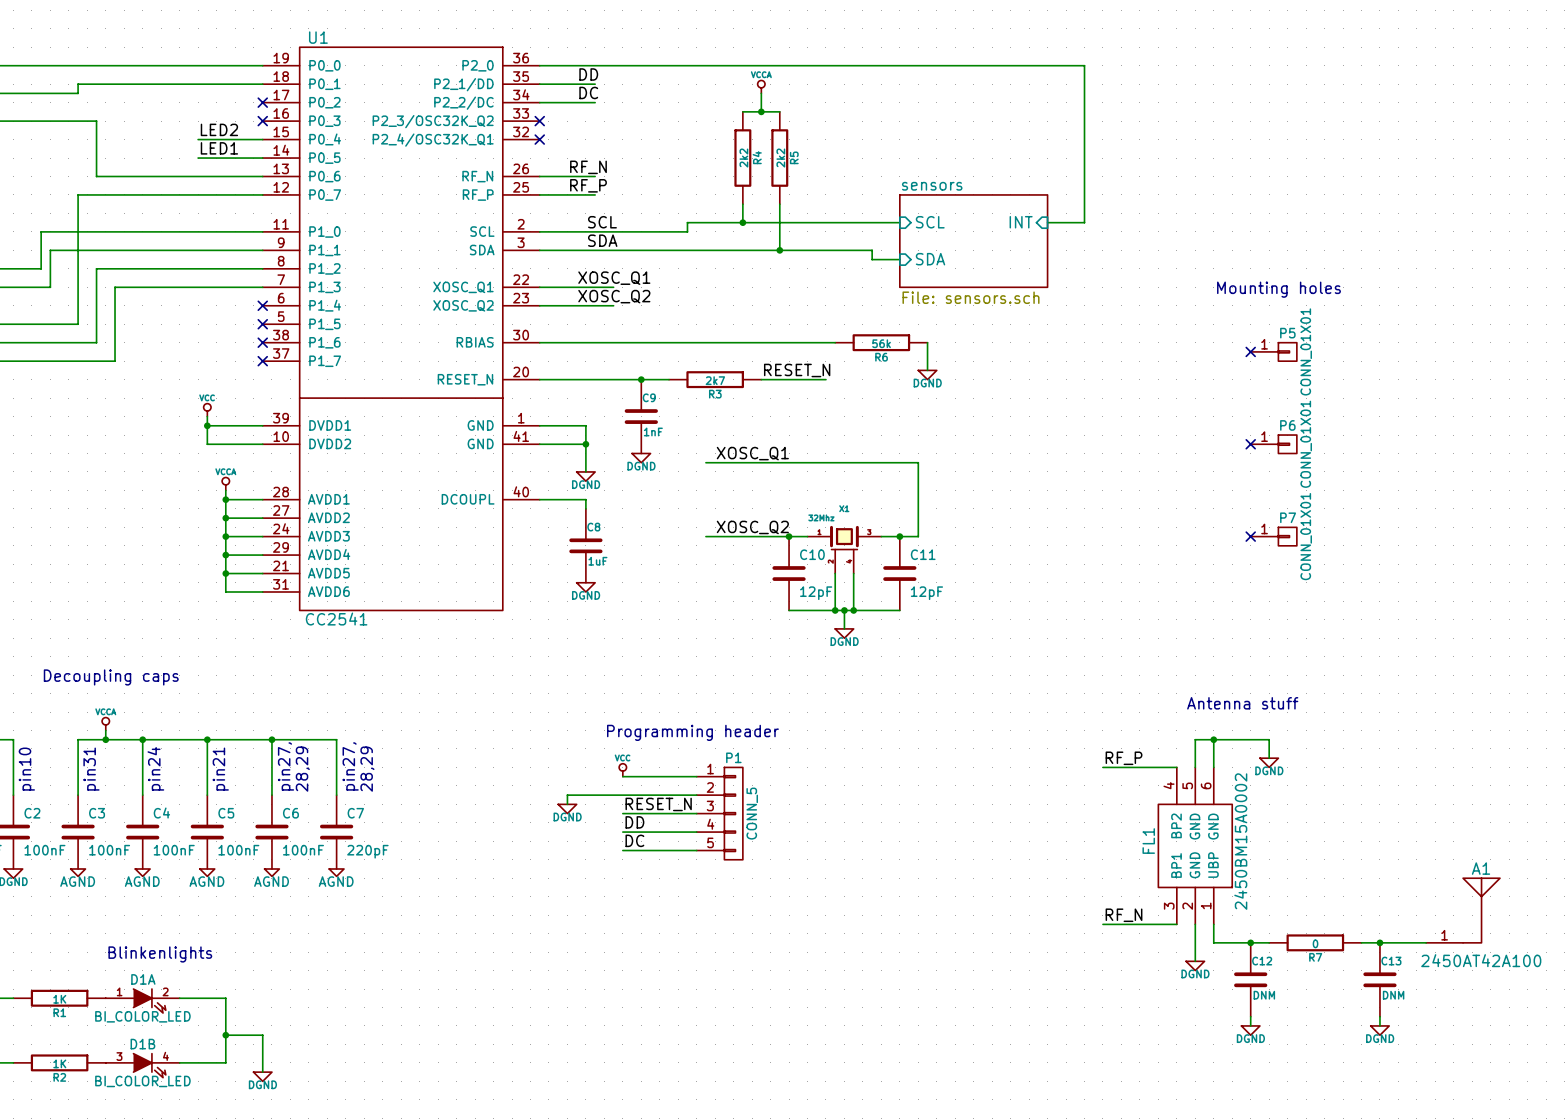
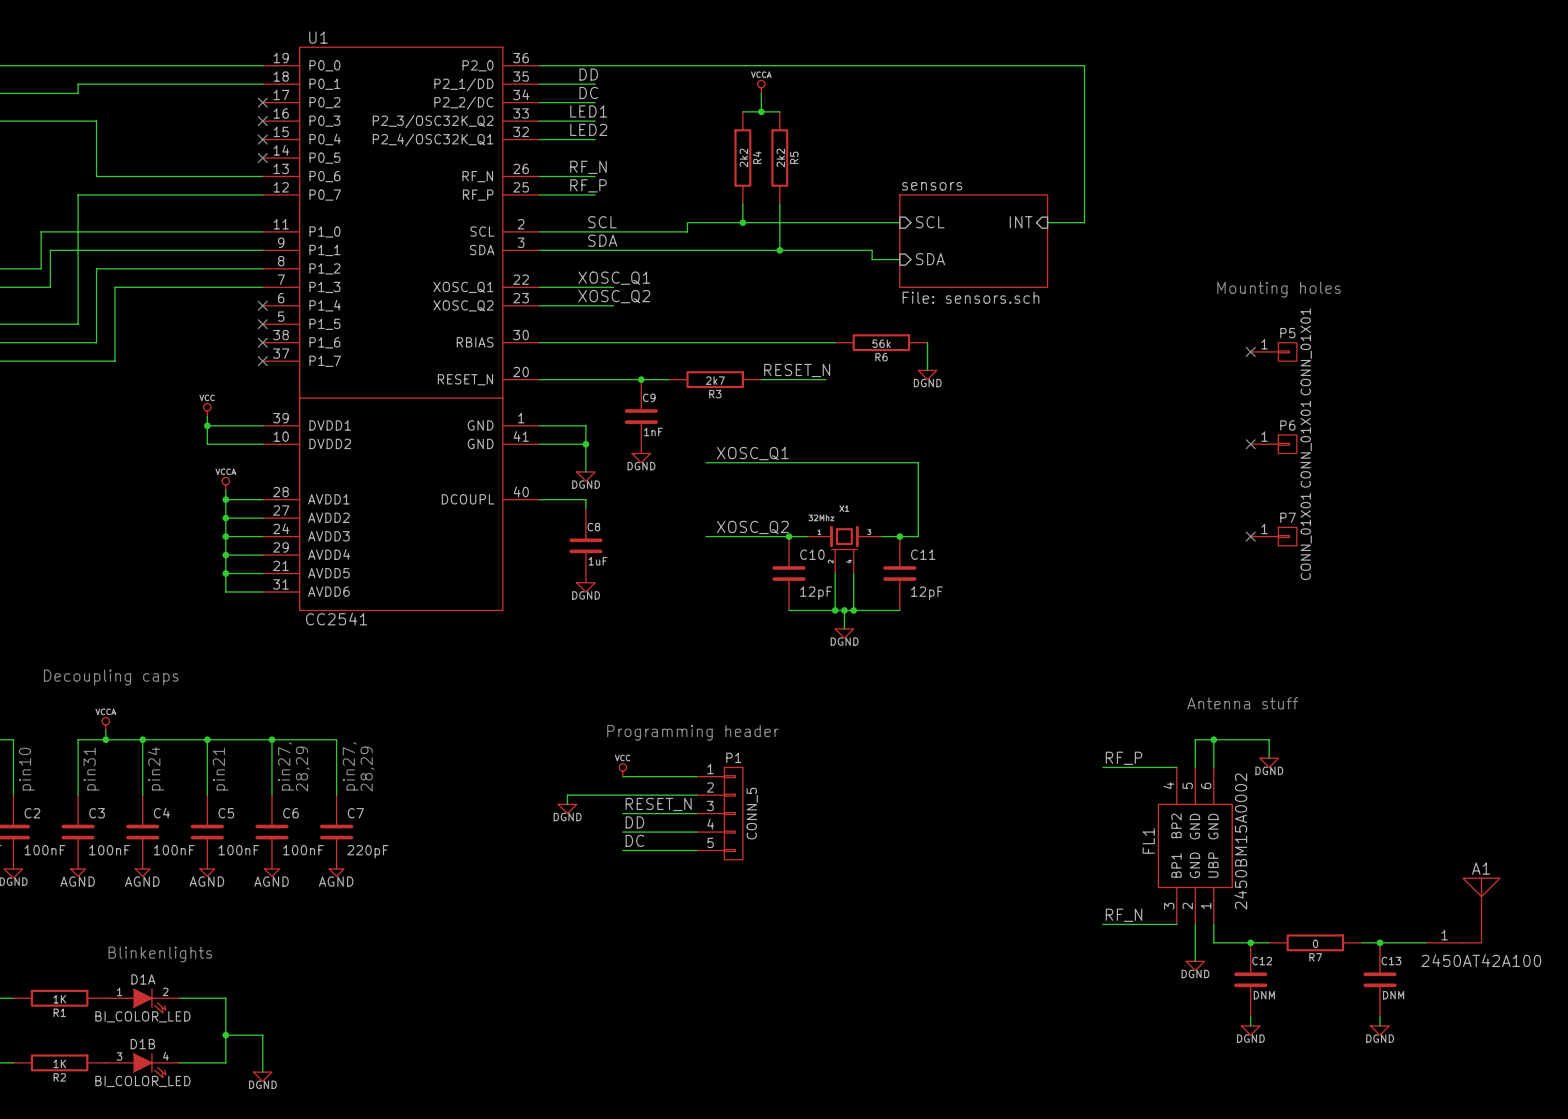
label: none -> LED1 (588, 111)
wire: none -> (539, 121) (595, 121)
no-connect mark: (539, 121) -> none
label: LED2 (219, 129) -> none
label: none -> LED2 (588, 129)
wire: (198, 139) (262, 139) -> none
no-connect mark: none -> (262, 139)
wire: none -> (539, 139) (595, 139)
no-connect mark: (539, 139) -> none
label: LED1 (219, 148) -> none
wire: (198, 158) (262, 158) -> none
no-connect mark: none -> (262, 158)

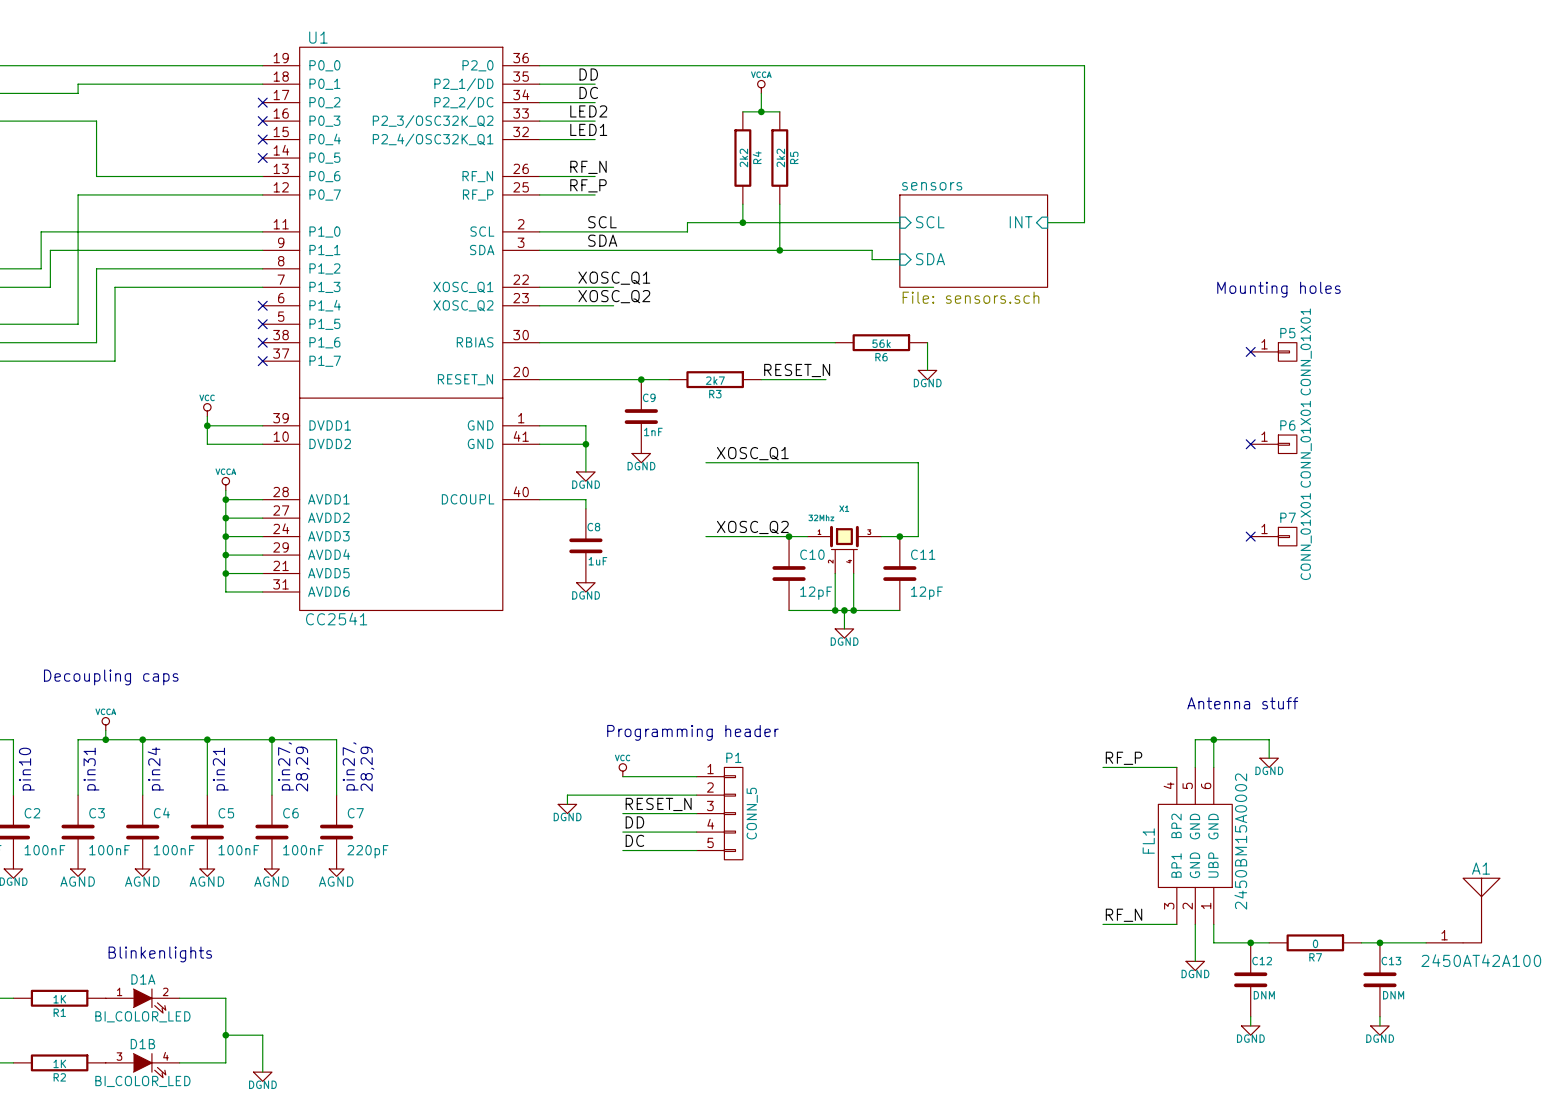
label: LED1 (588, 111) -> LED2 (588, 111)
label: LED2 (588, 129) -> LED1 (588, 129)

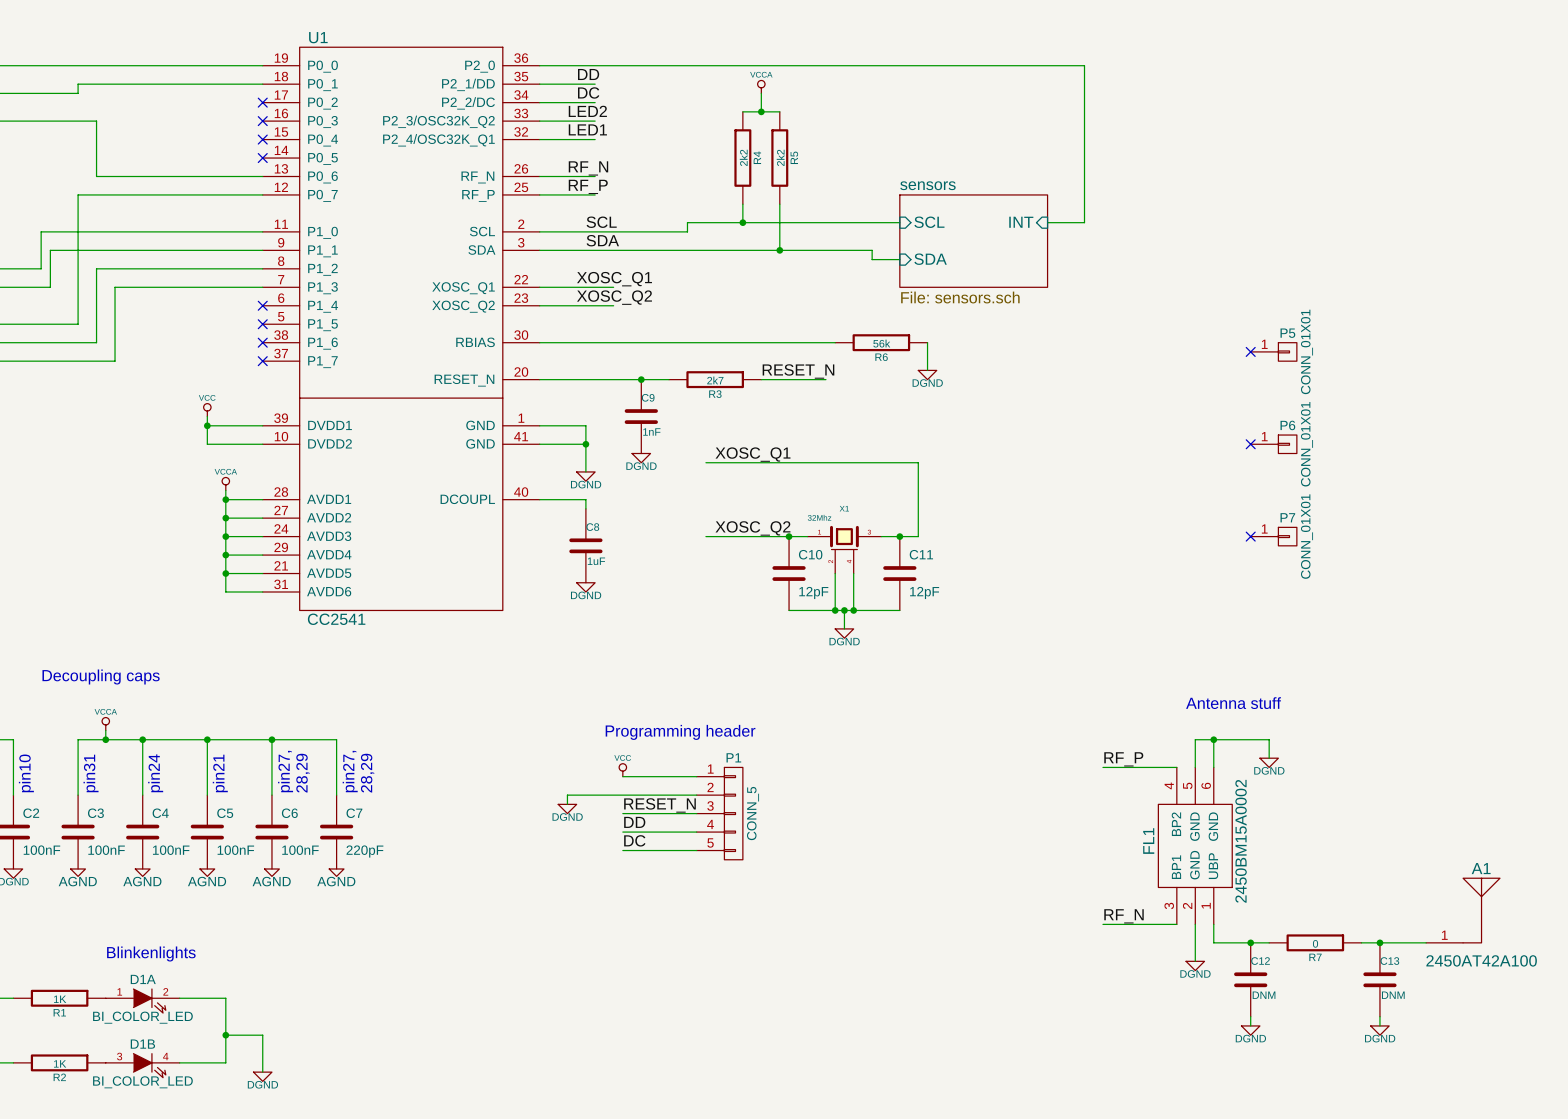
text: Mounting holes (1278, 289) -> none

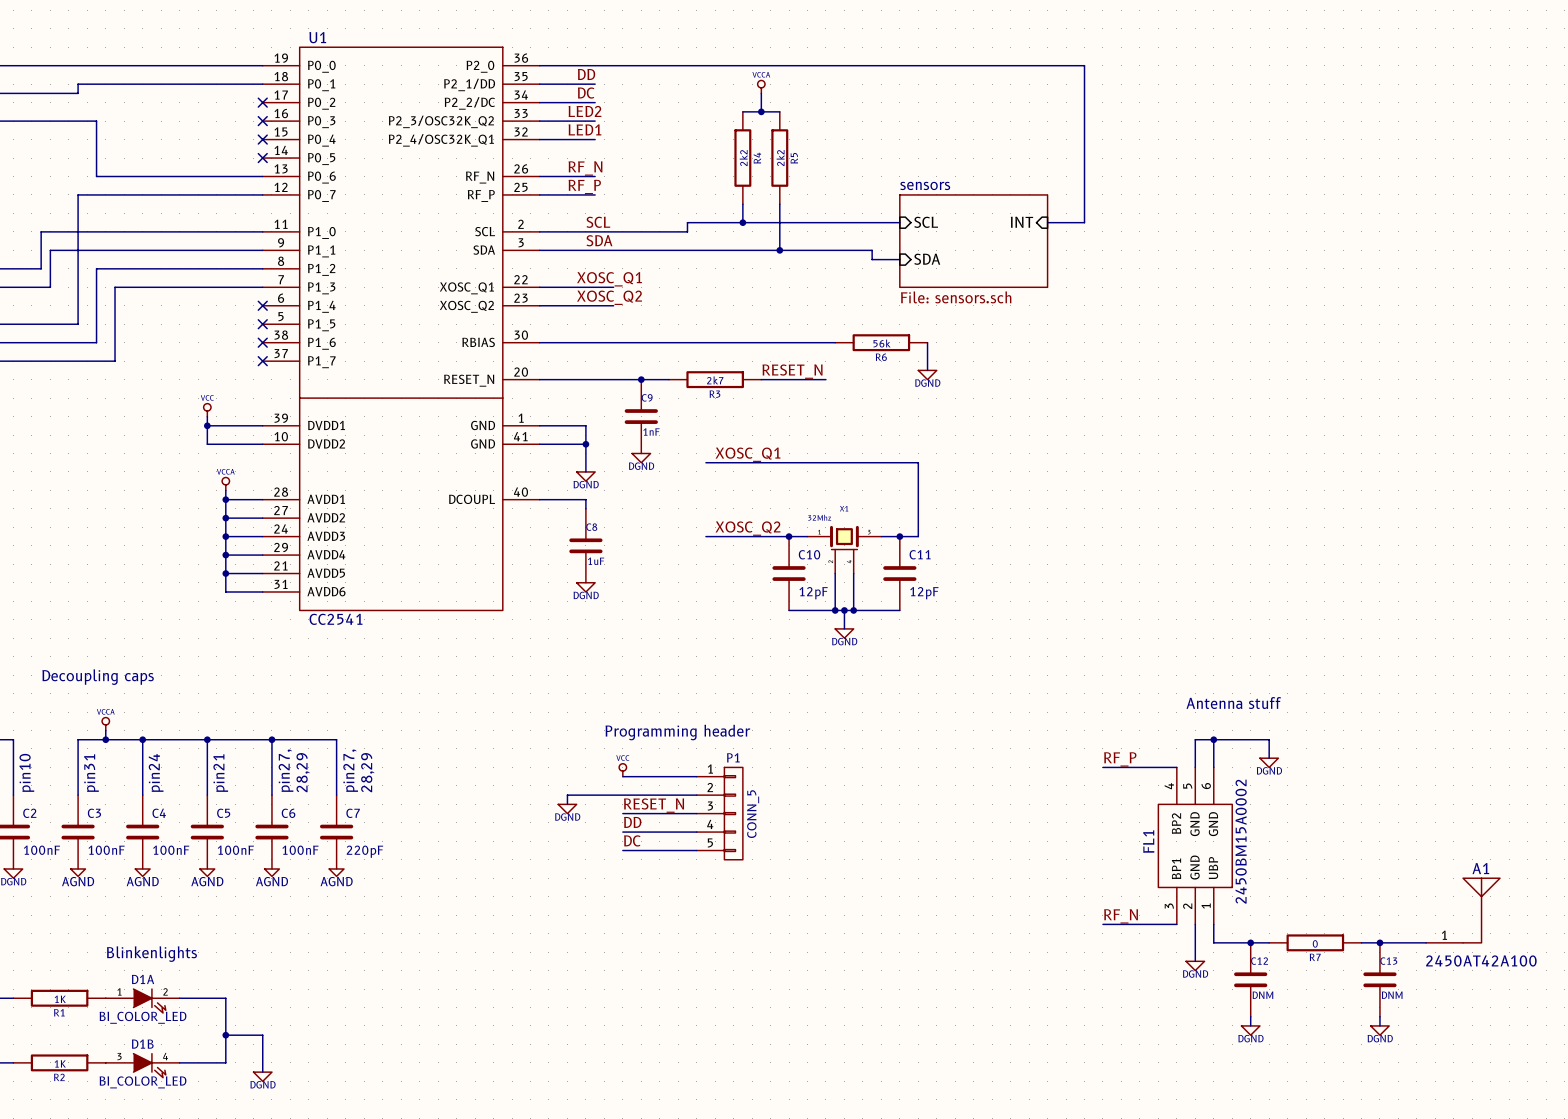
no-connect mark: (1250, 351) -> none
P5: CONN_01X01 (1273, 351) -> none
no-connect mark: (1250, 444) -> none
P6: CONN_01X01 (1273, 444) -> none
no-connect mark: (1250, 536) -> none
P7: CONN_01X01 (1273, 536) -> none

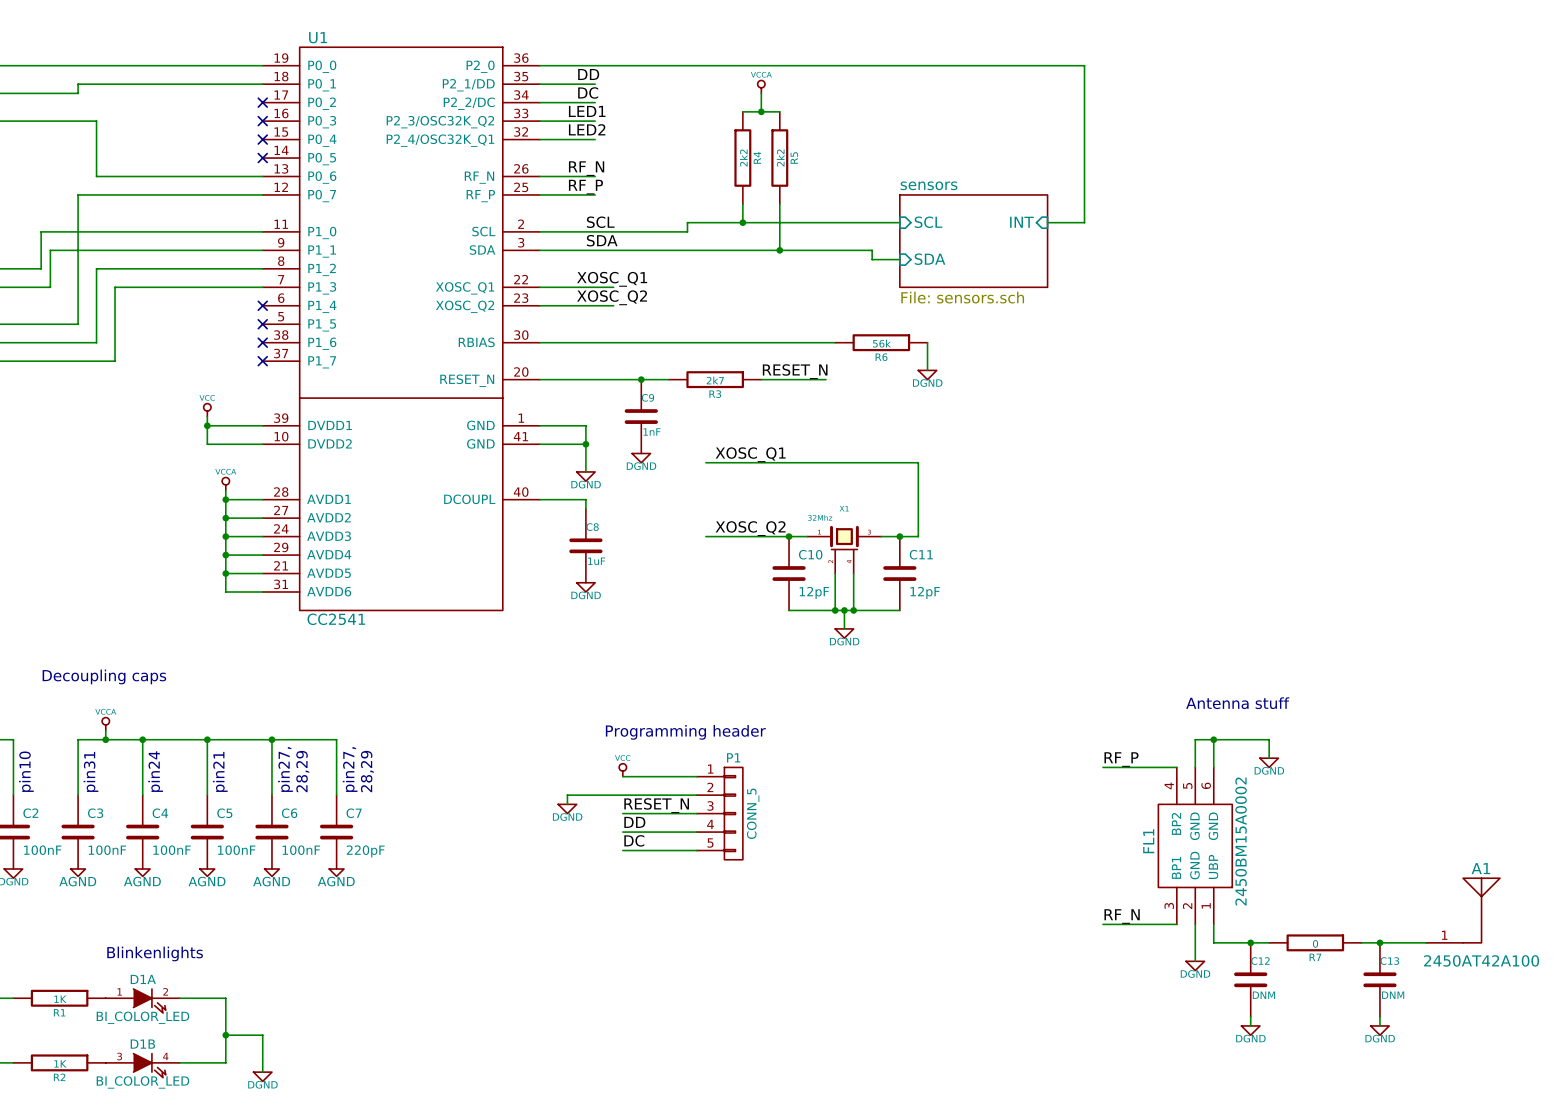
label: LED2 (584, 111) -> LED1 (587, 111)
label: LED1 (584, 129) -> LED2 (587, 129)

